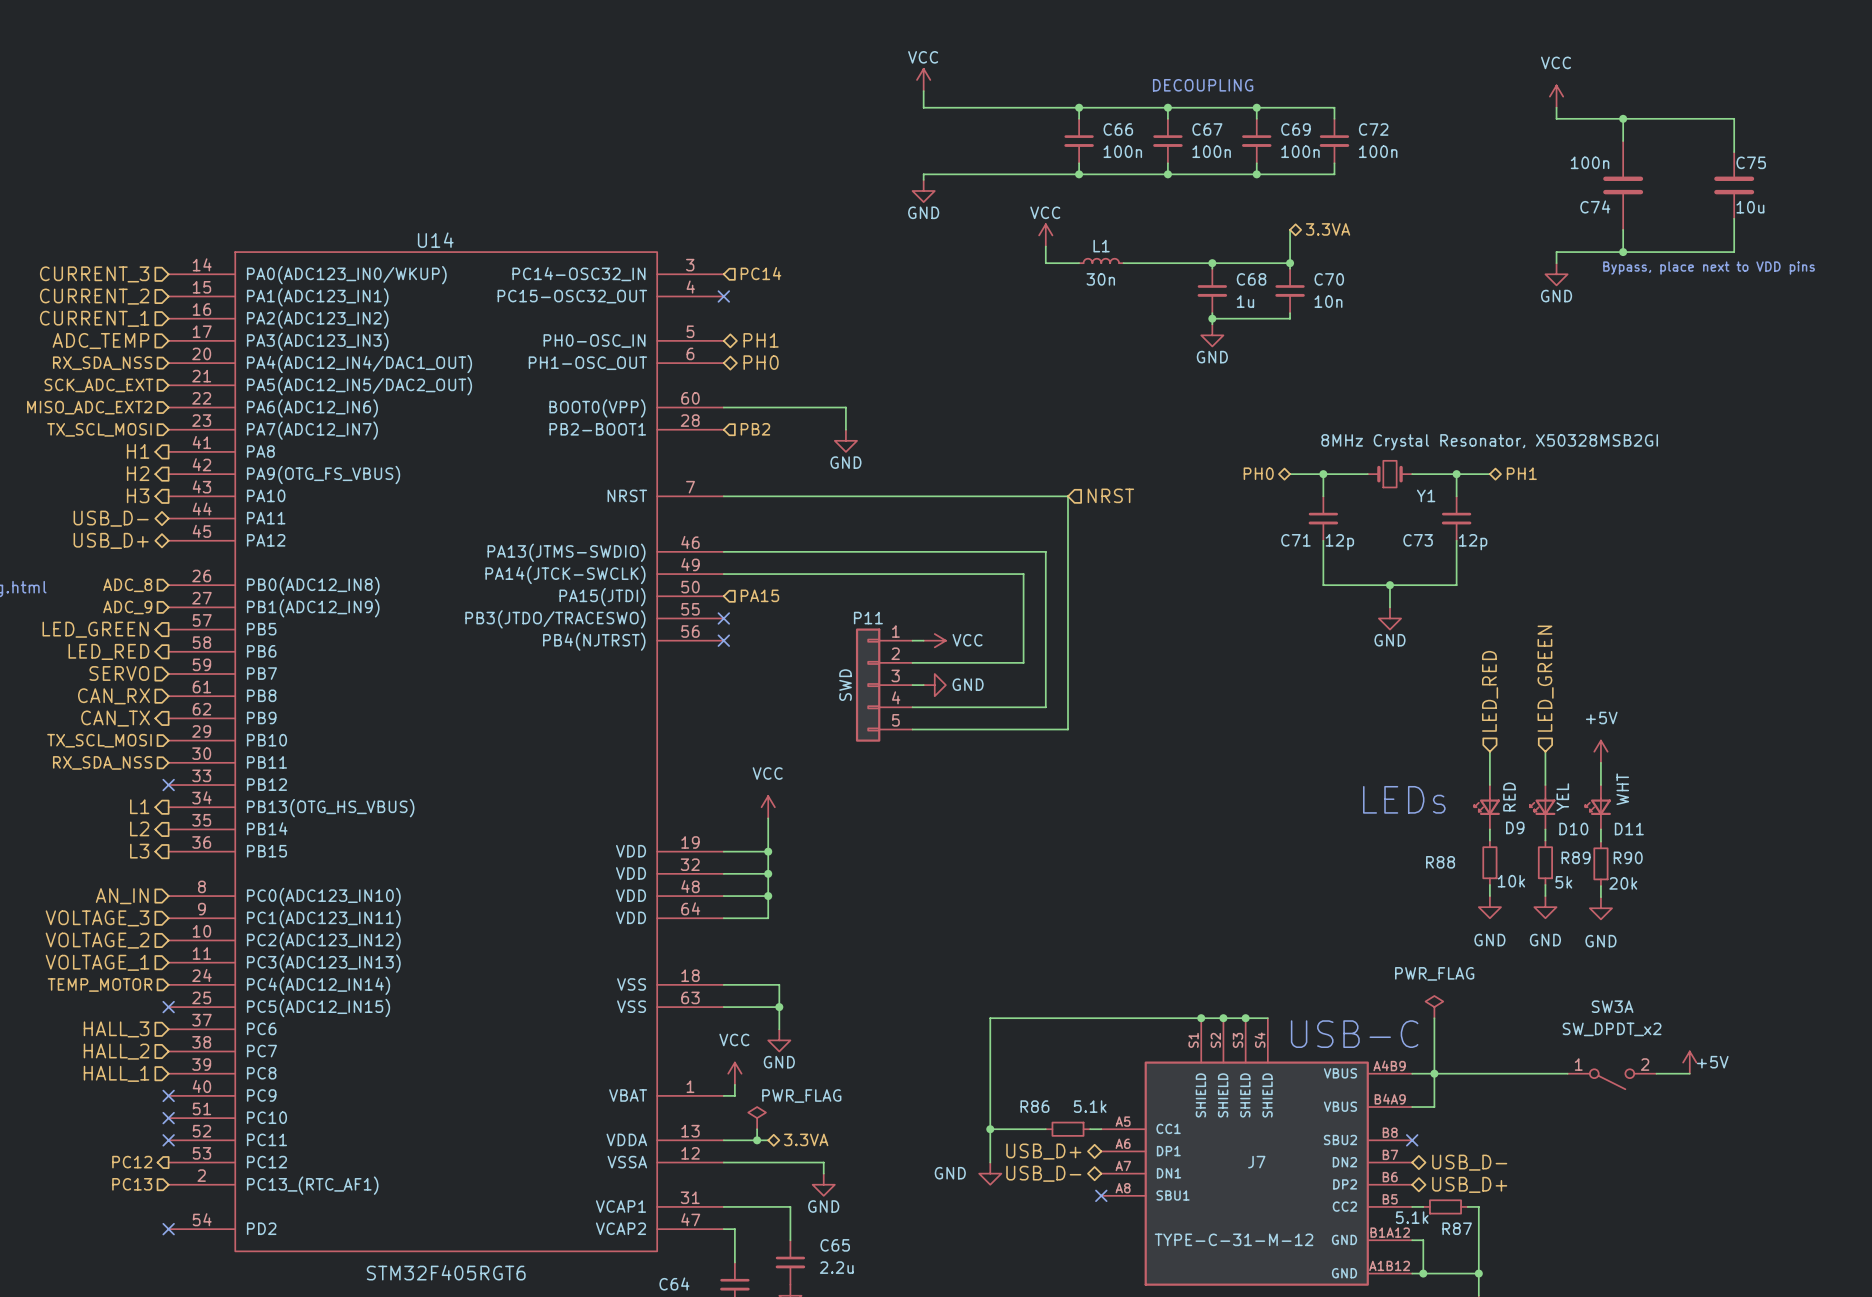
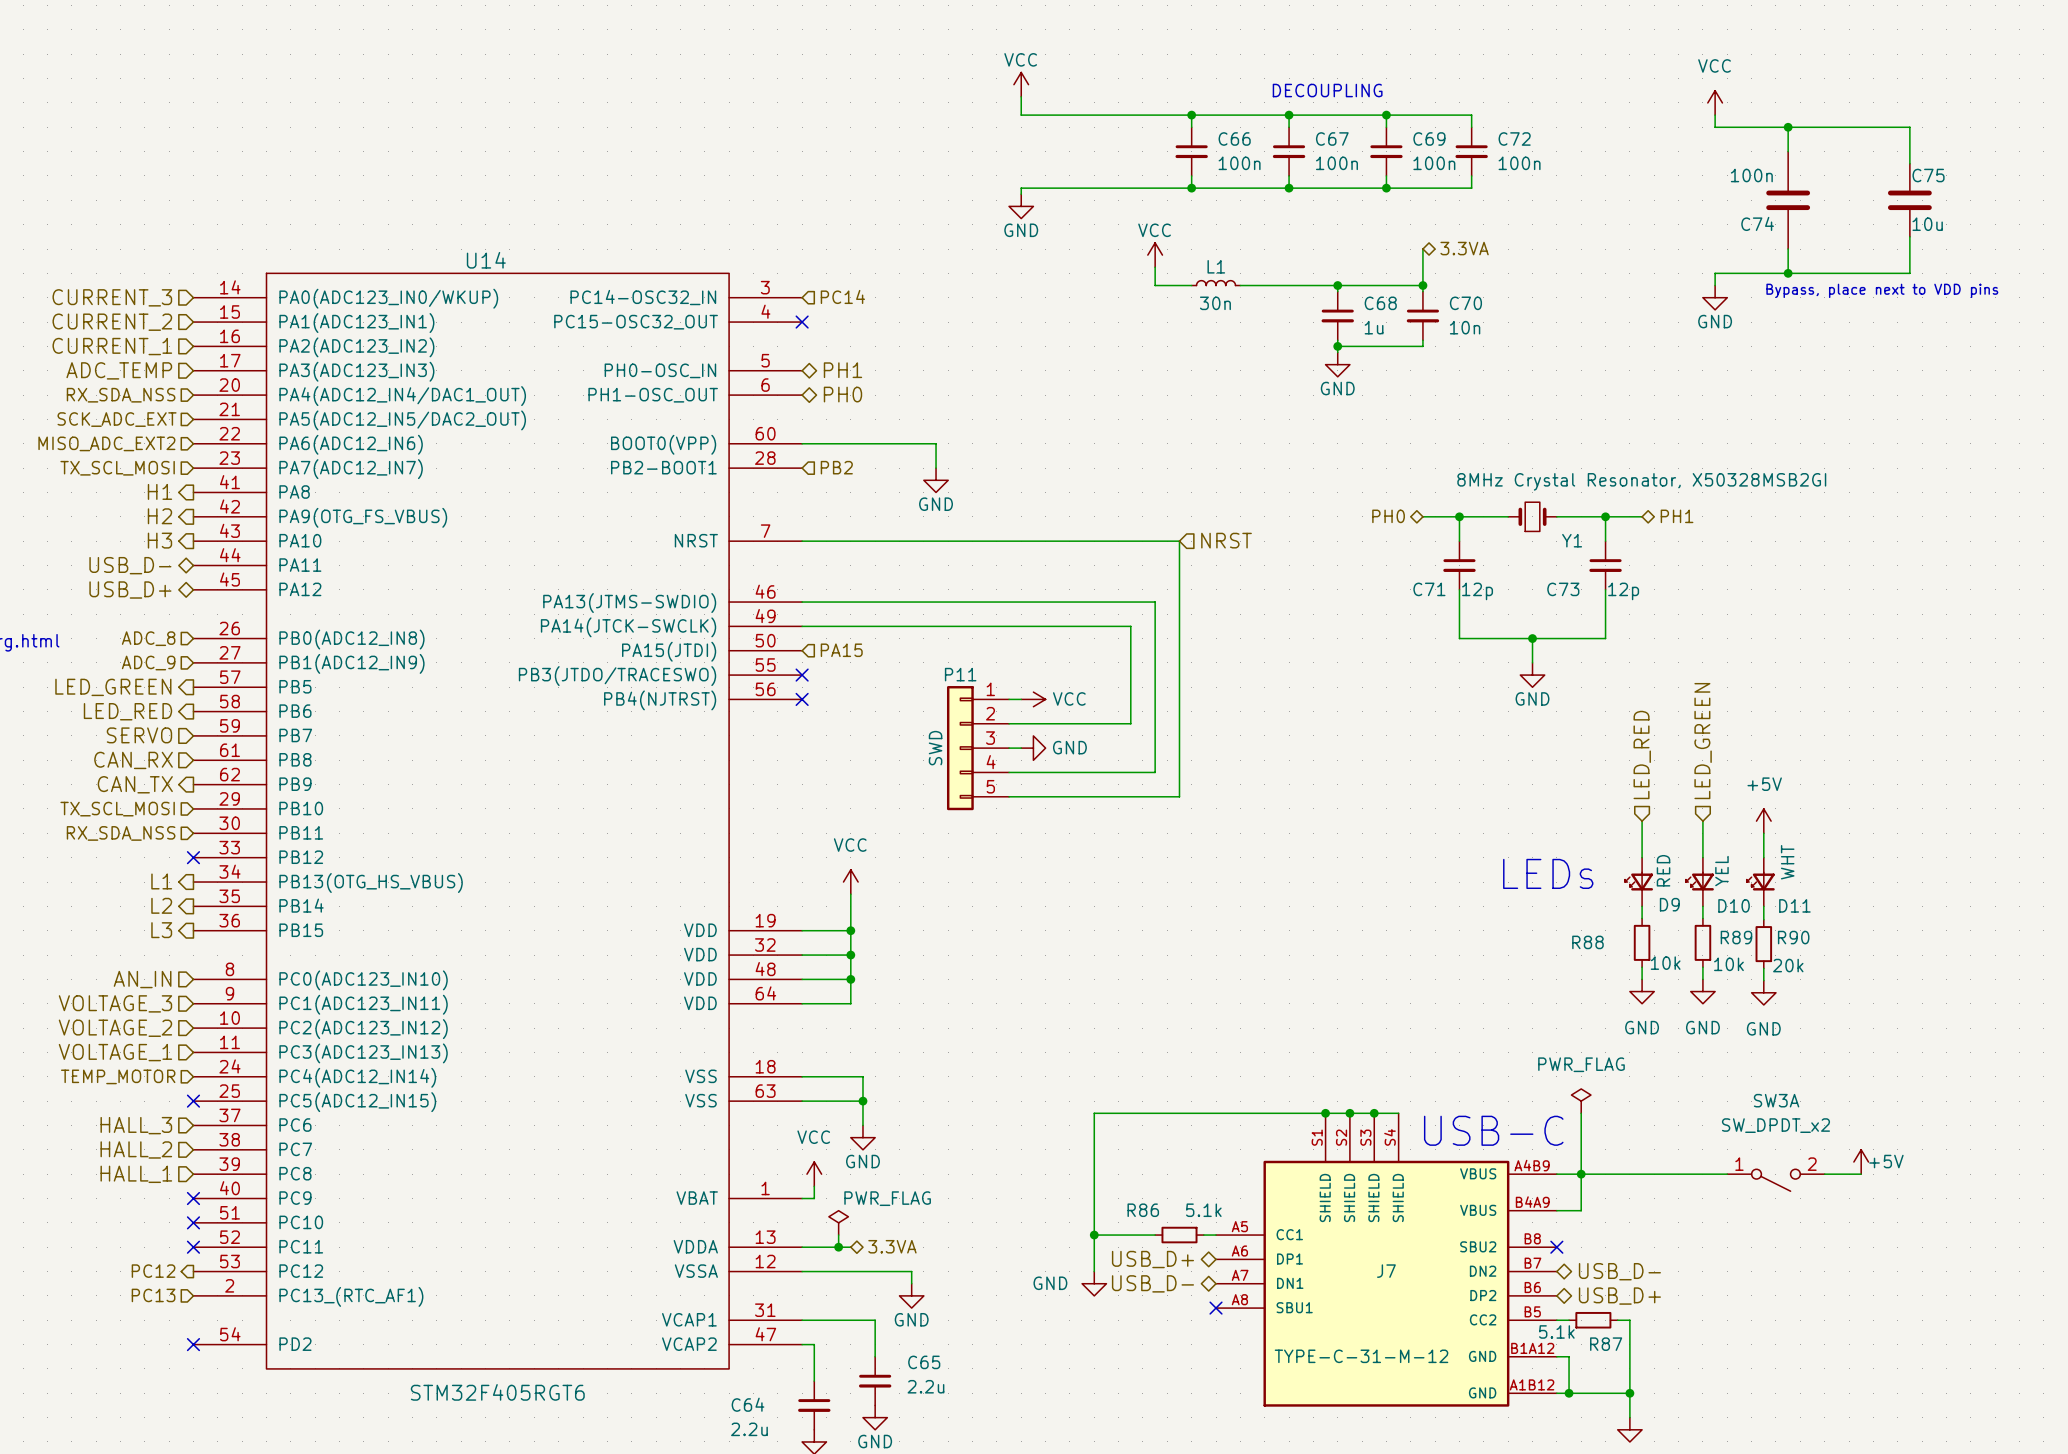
R89 value: 5k (1563, 882) -> 10k (1728, 964)

